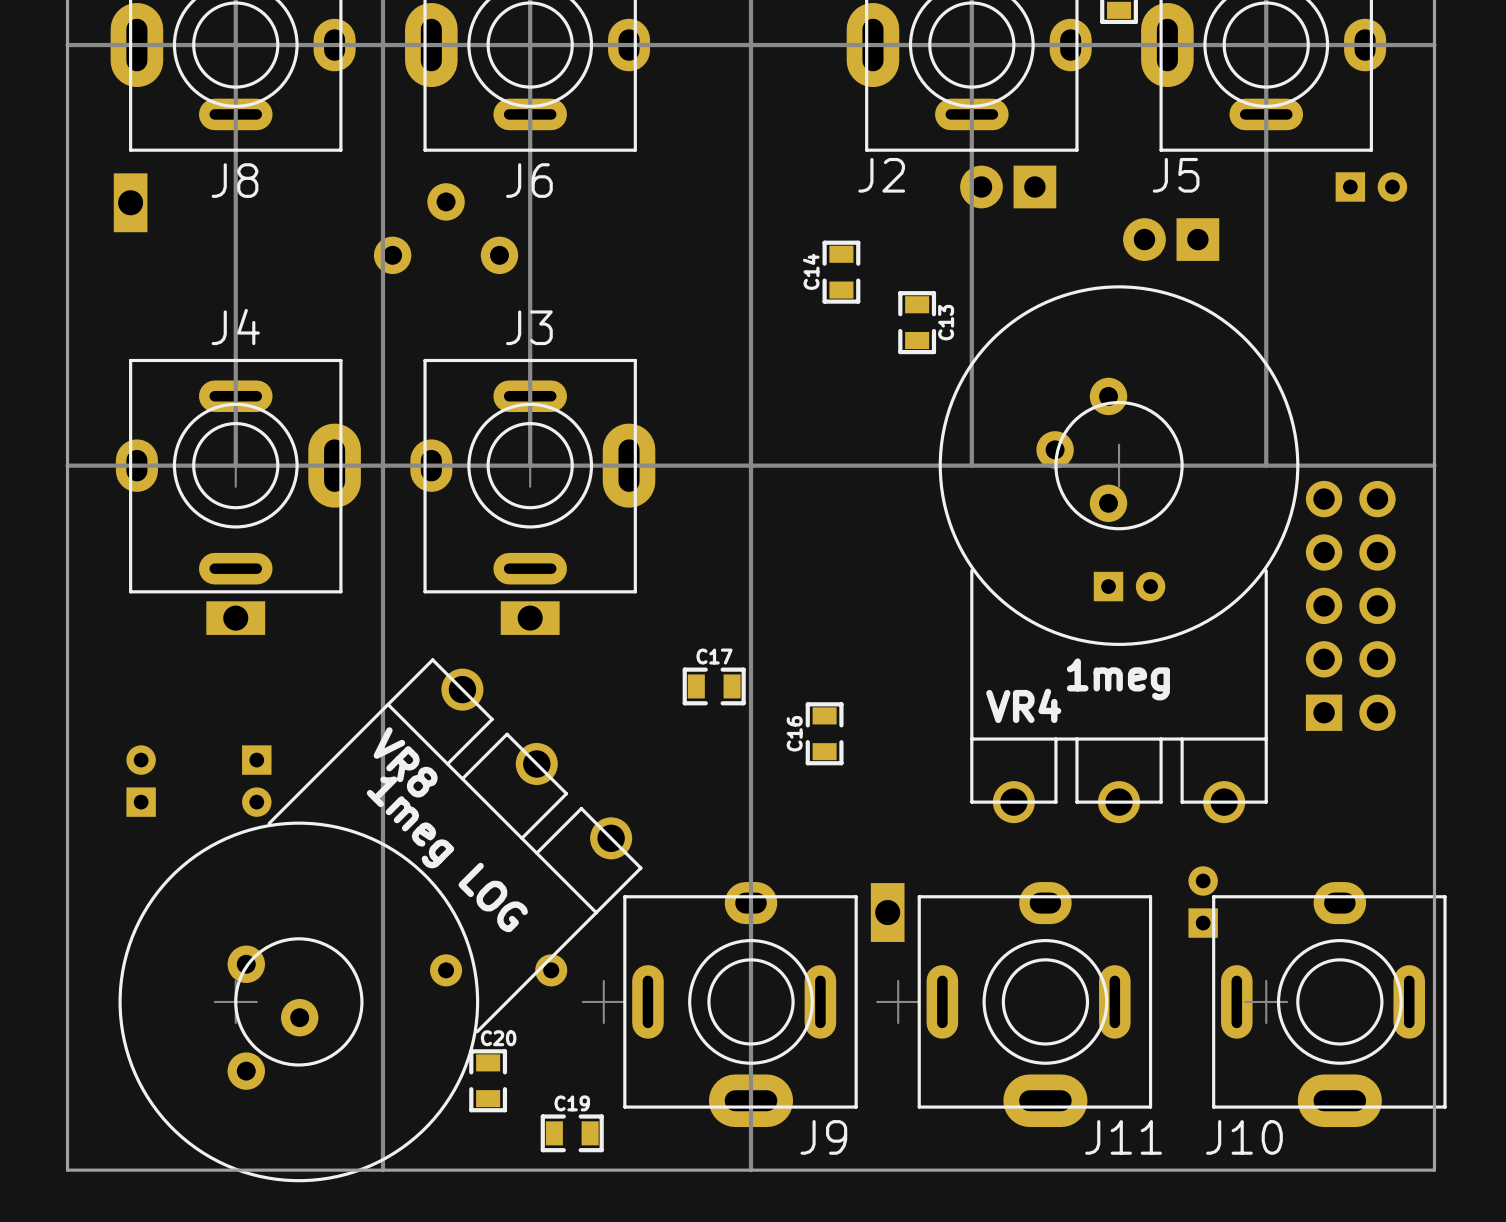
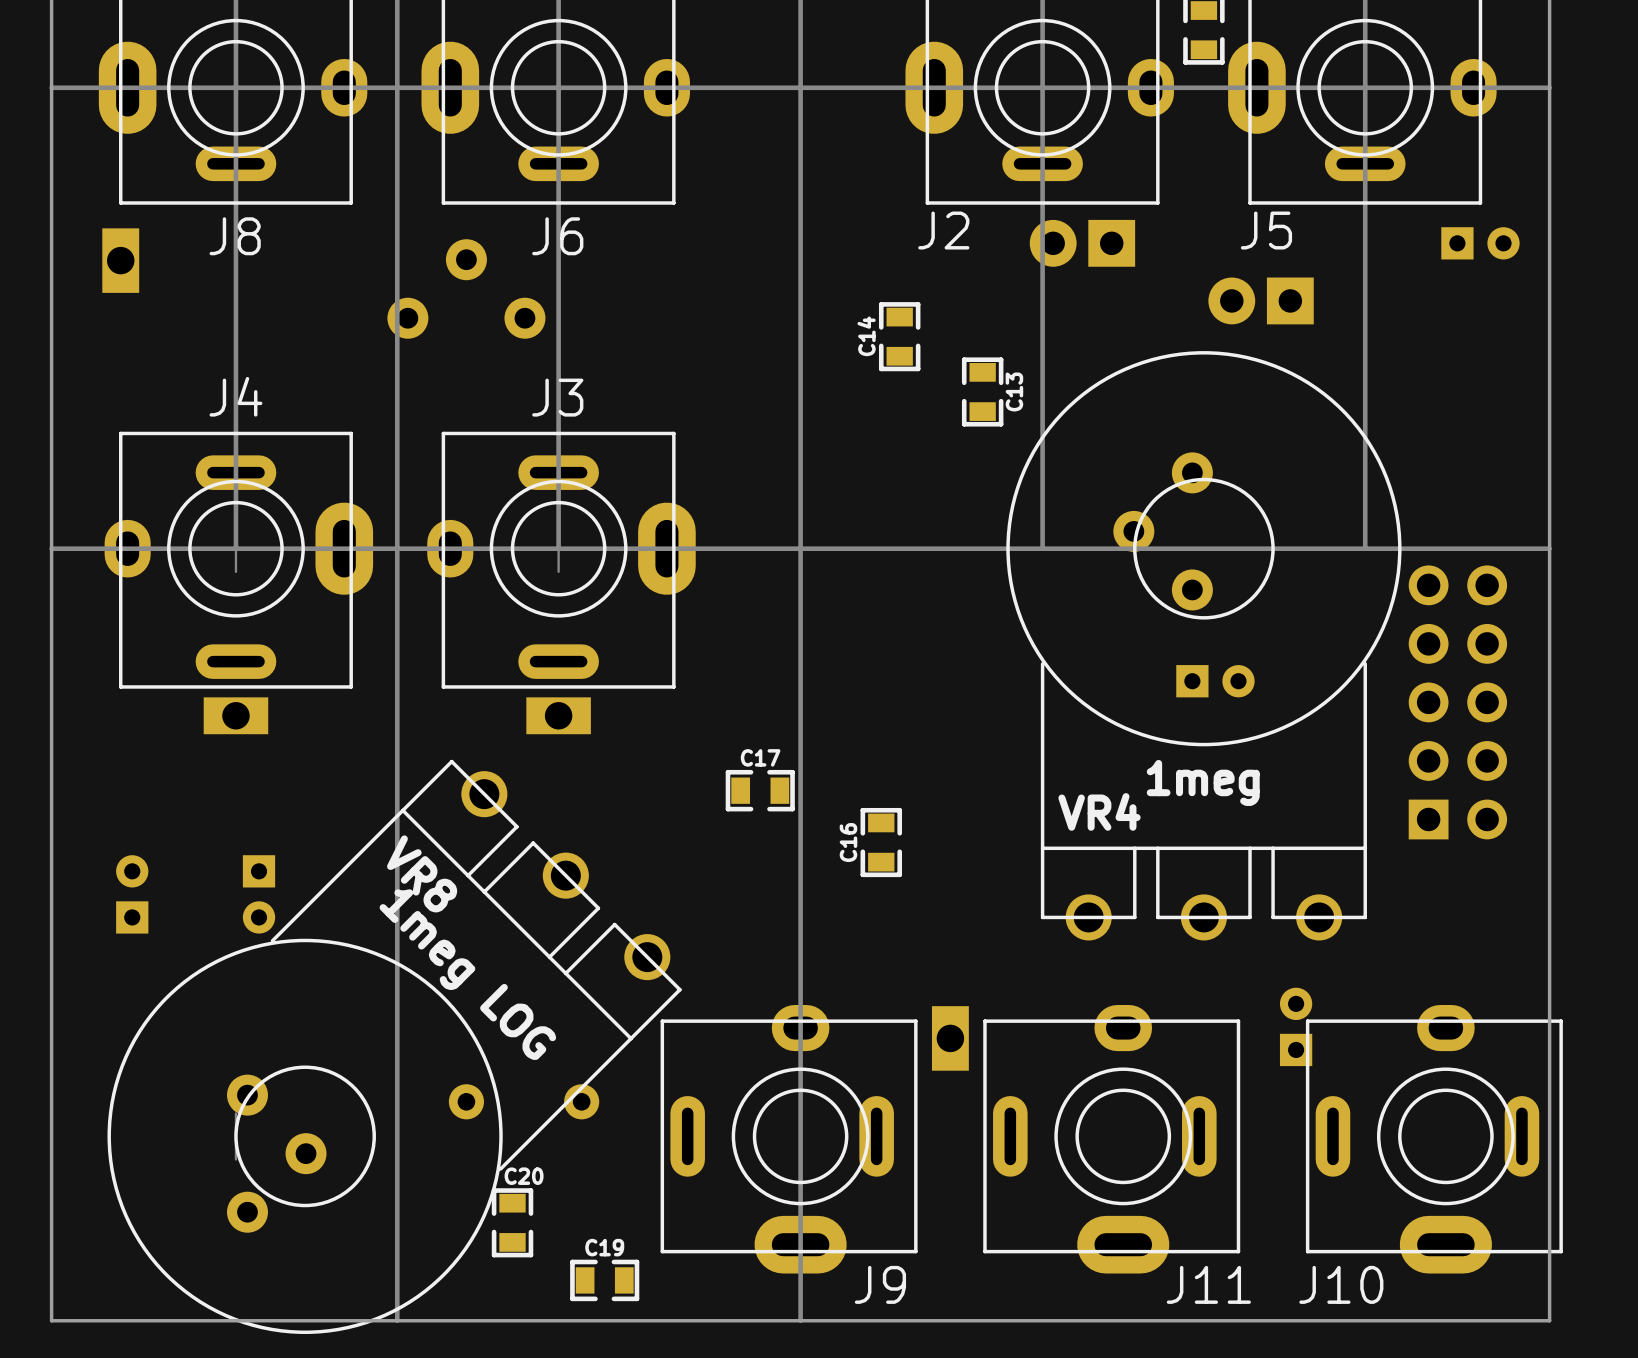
line: (1119, 444) (1119, 486) -> none
line: (603, 980) (603, 1022) -> none
line: (898, 980) (898, 1022) -> none
line: (1266, 980) (1266, 1022) -> none
line: (214, 1001) (256, 1001) -> none
line: (582, 1001) (624, 1001) -> none
line: (877, 1001) (919, 1001) -> none
line: (1245, 1001) (1287, 1001) -> none

